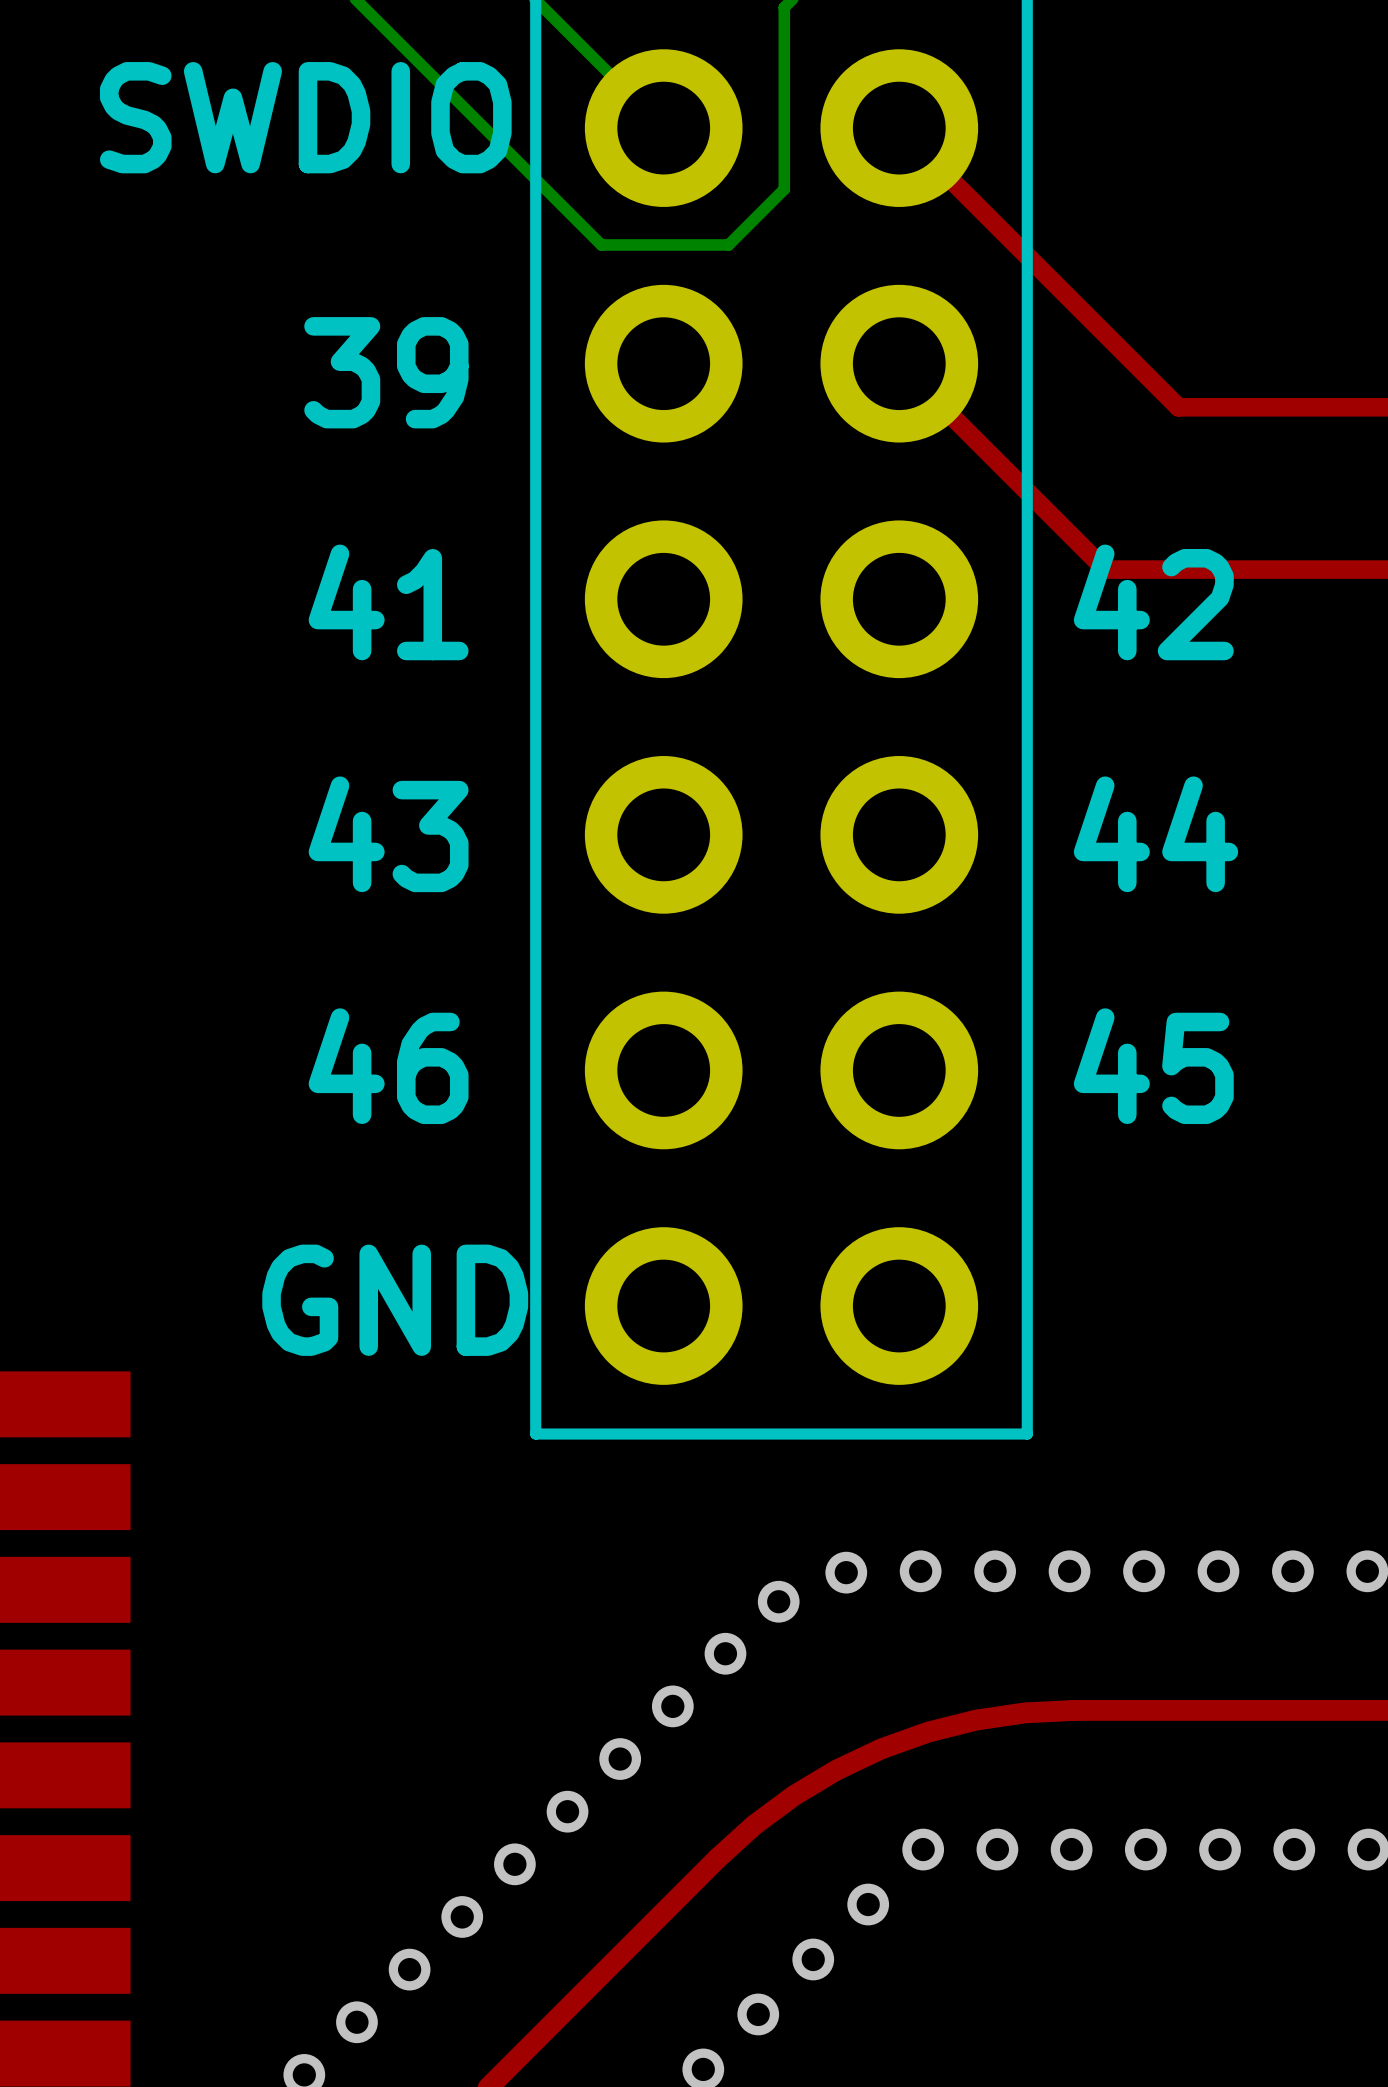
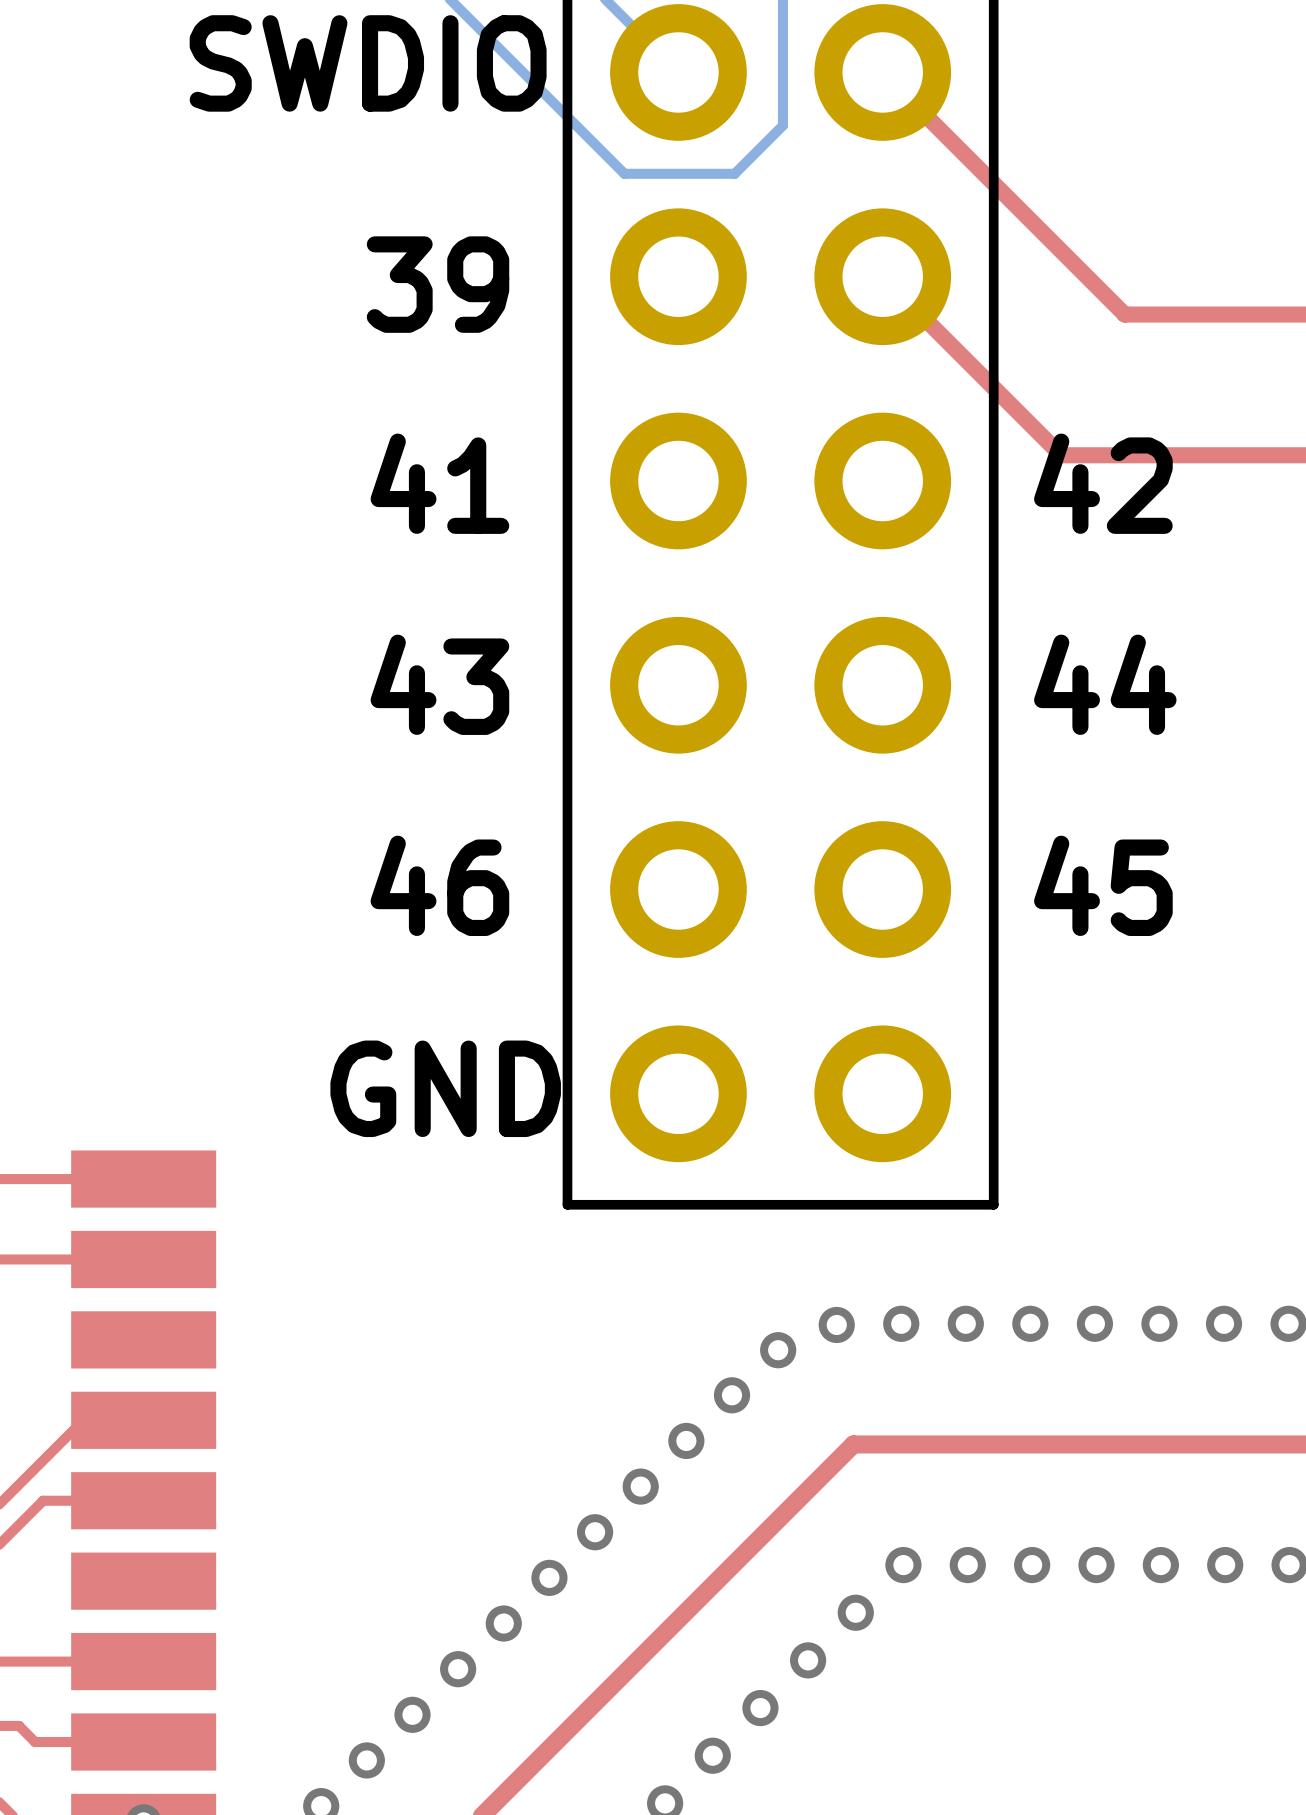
top track: (1074, 1710) (1025, 1712) (976, 1720) (928, 1732) (881, 1748) (836, 1770) (794, 1795) (754, 1824) (717, 1858) -> (1034, 1444) (853, 1444) (725, 1572)

